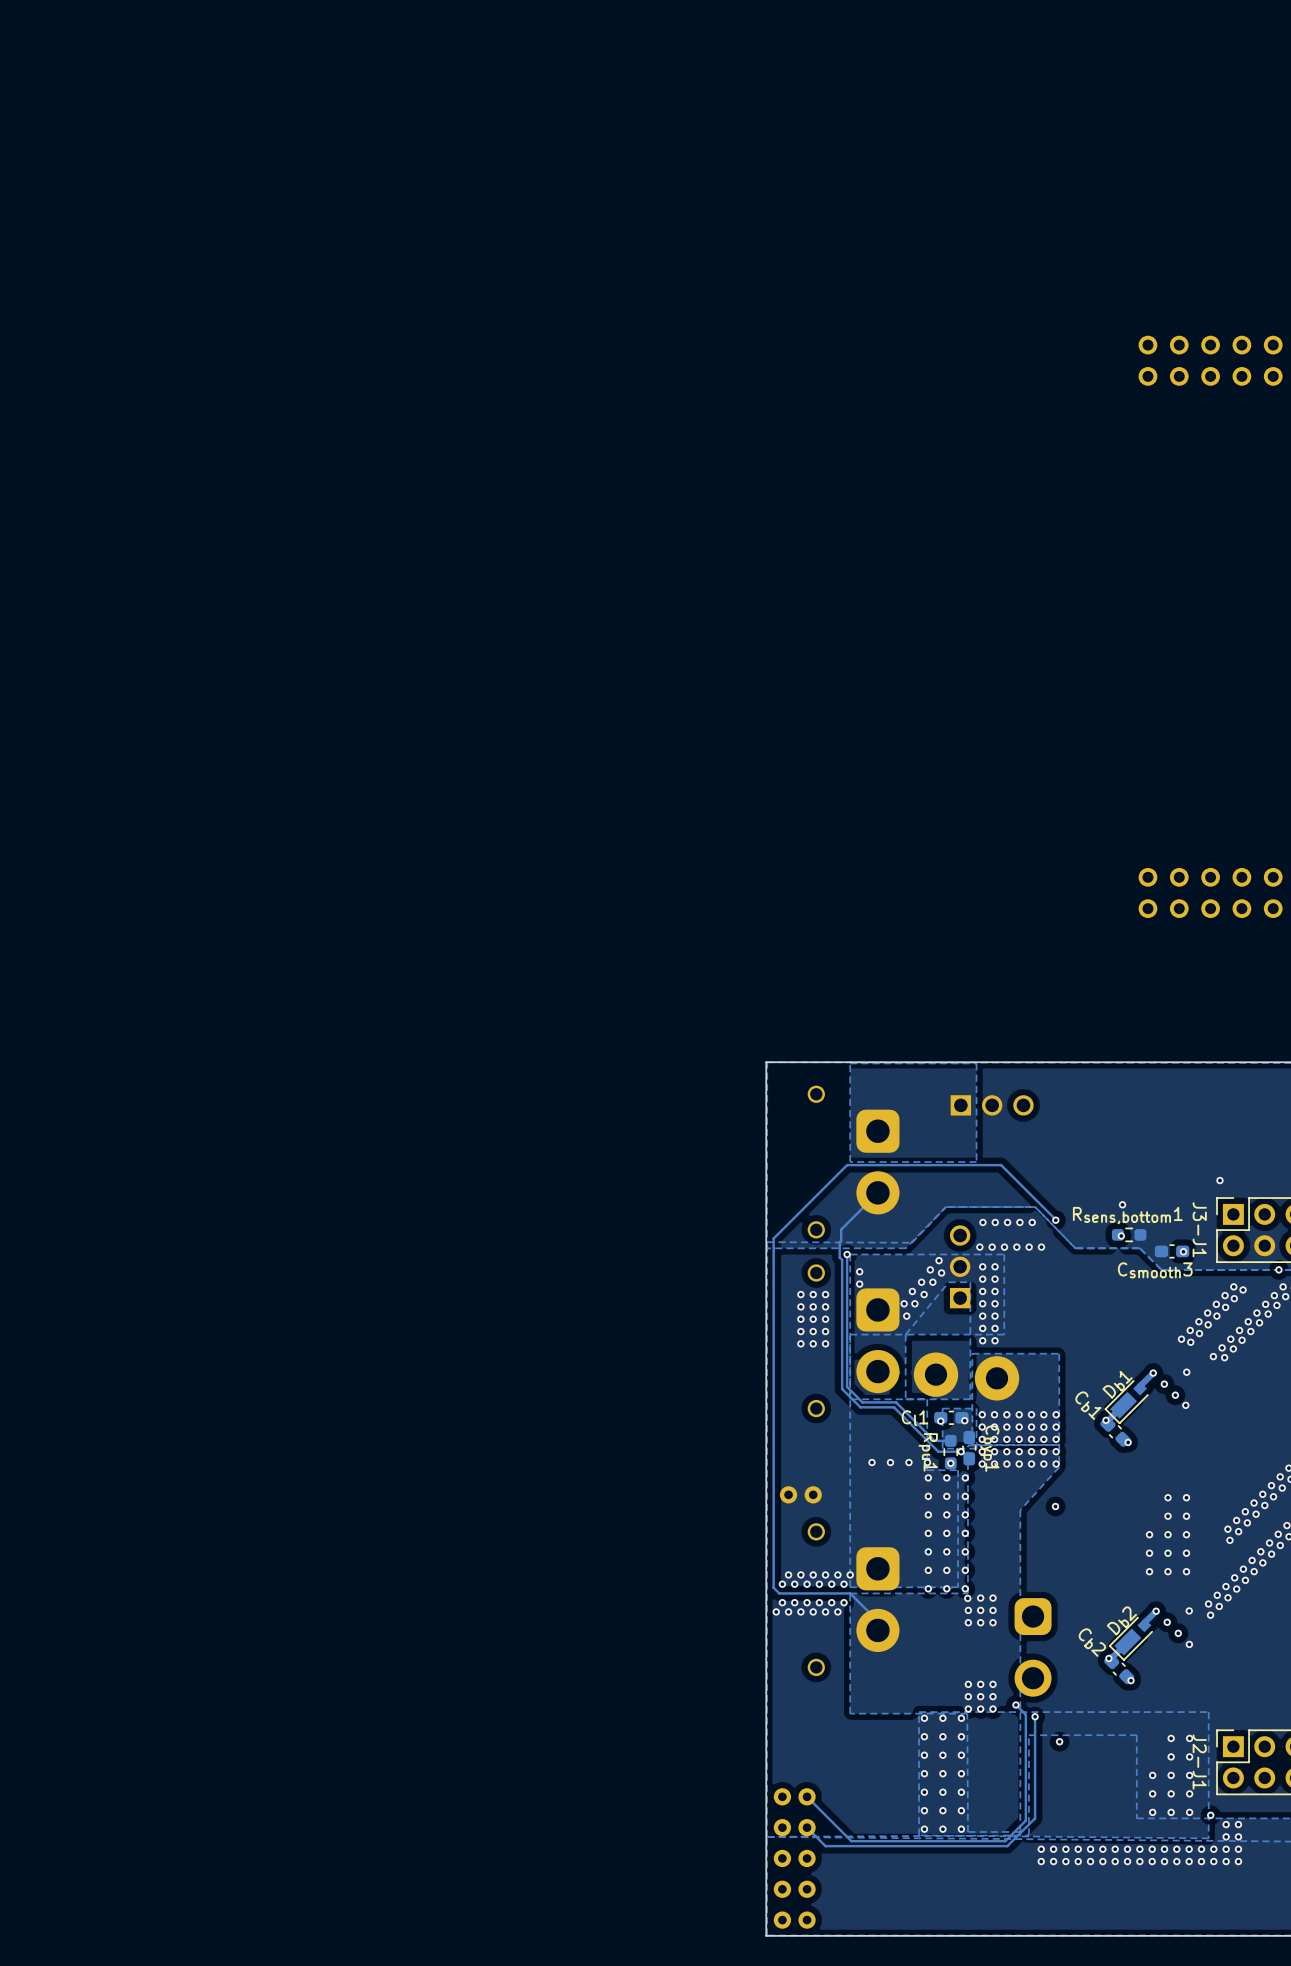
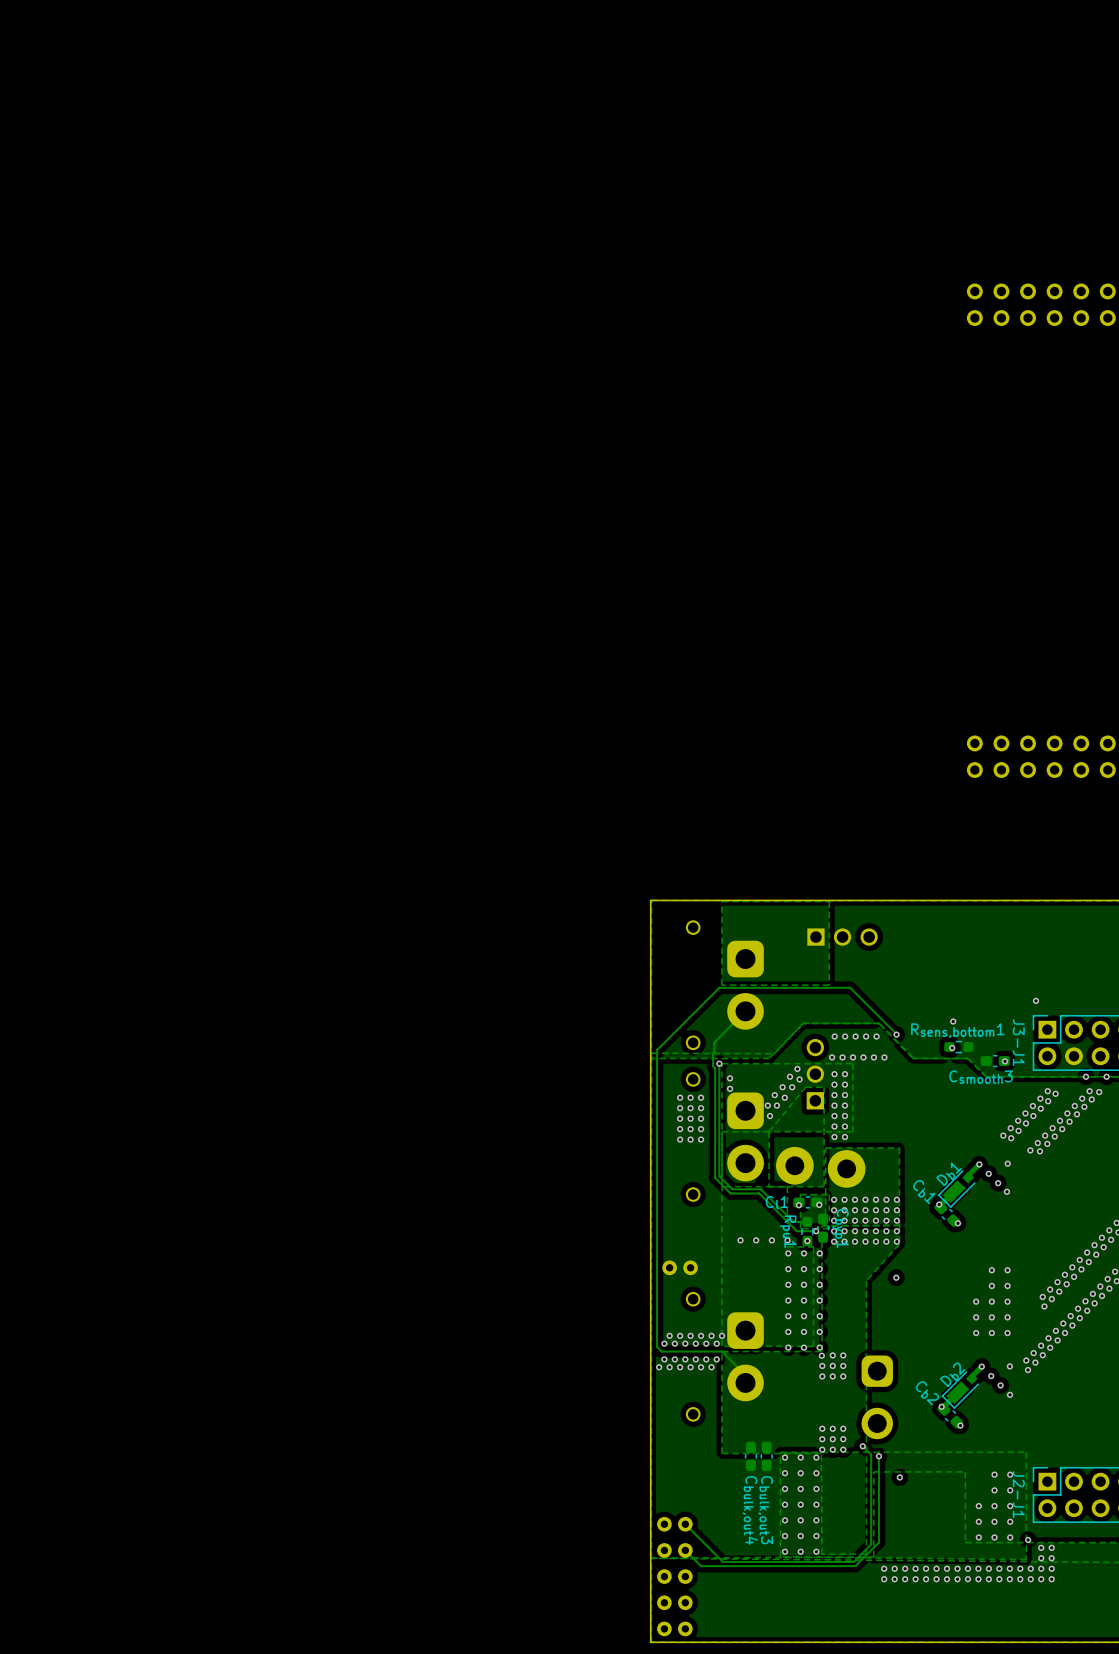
Cbulk,out4: none -> (750, 1456)
Cbulk,out3: none -> (766, 1456)

